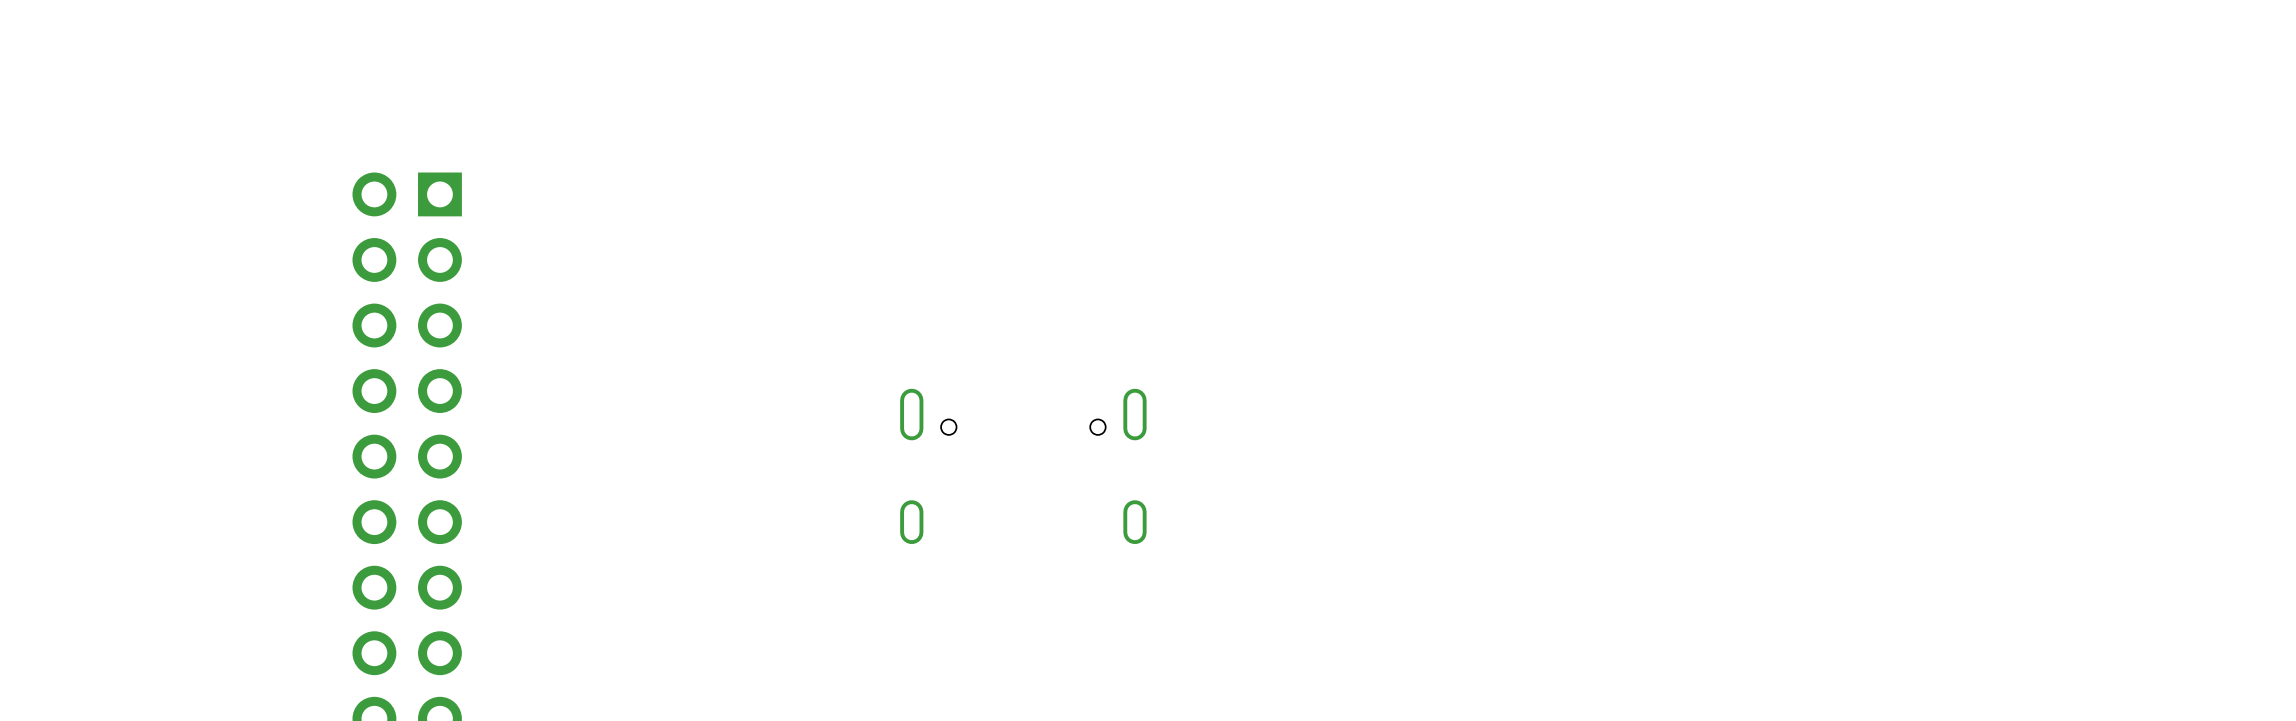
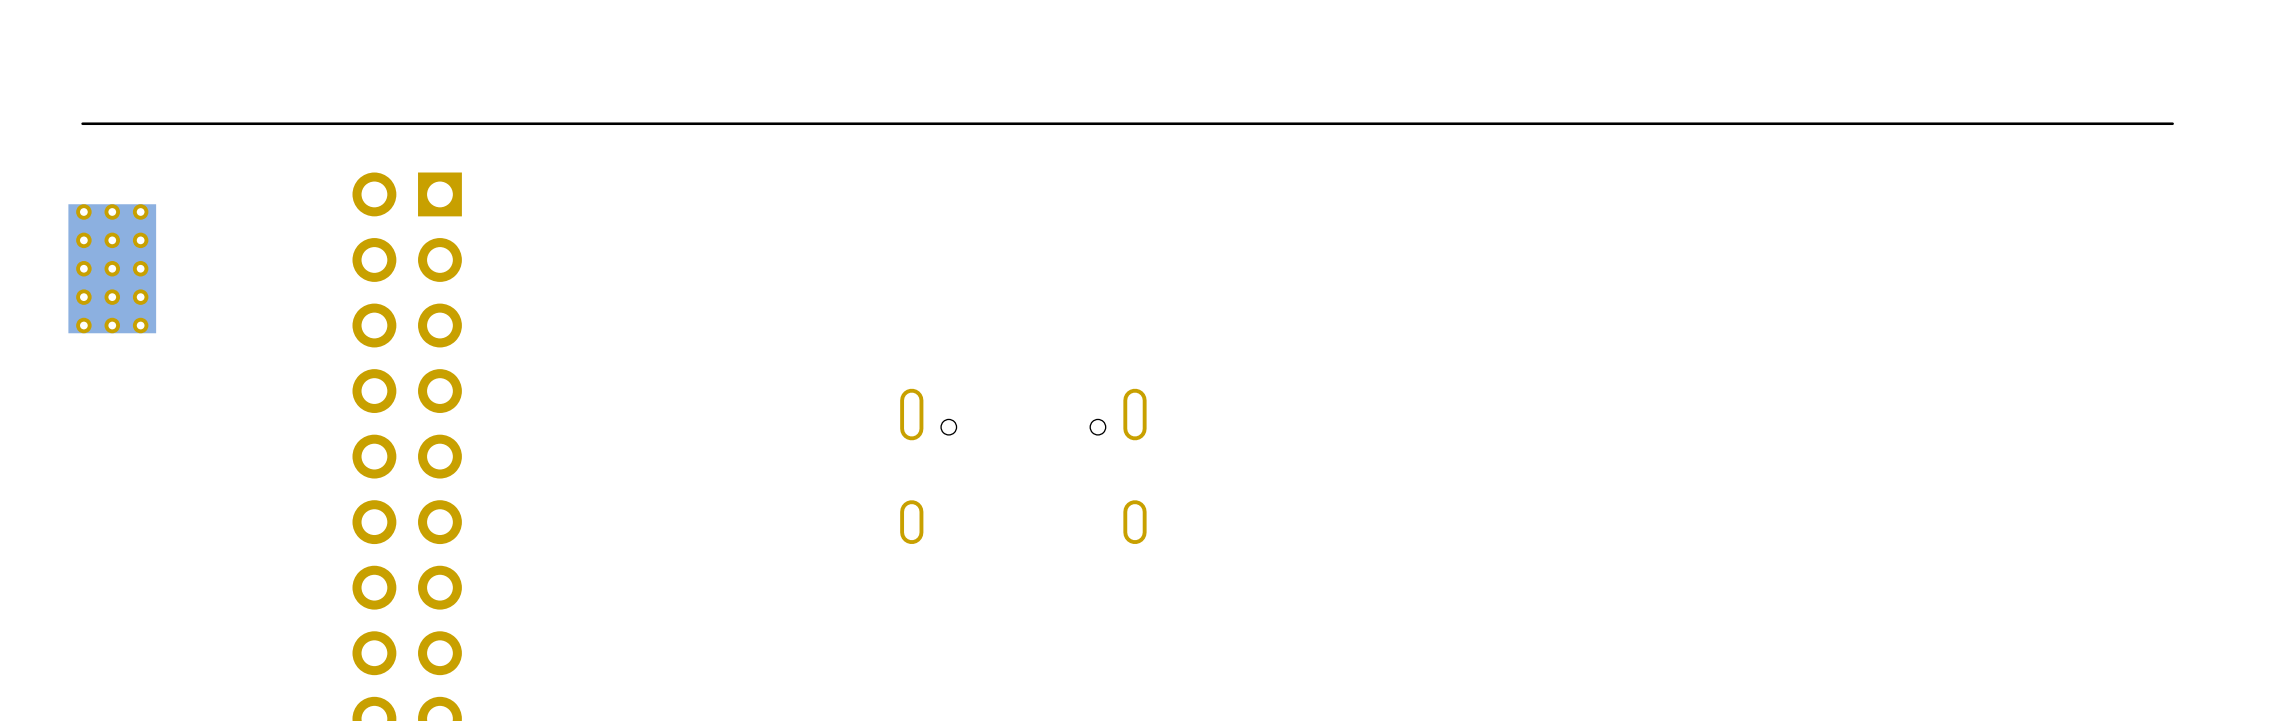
board edge: none -> (2172, 123) (82, 123)
part: none -> (112, 268)

